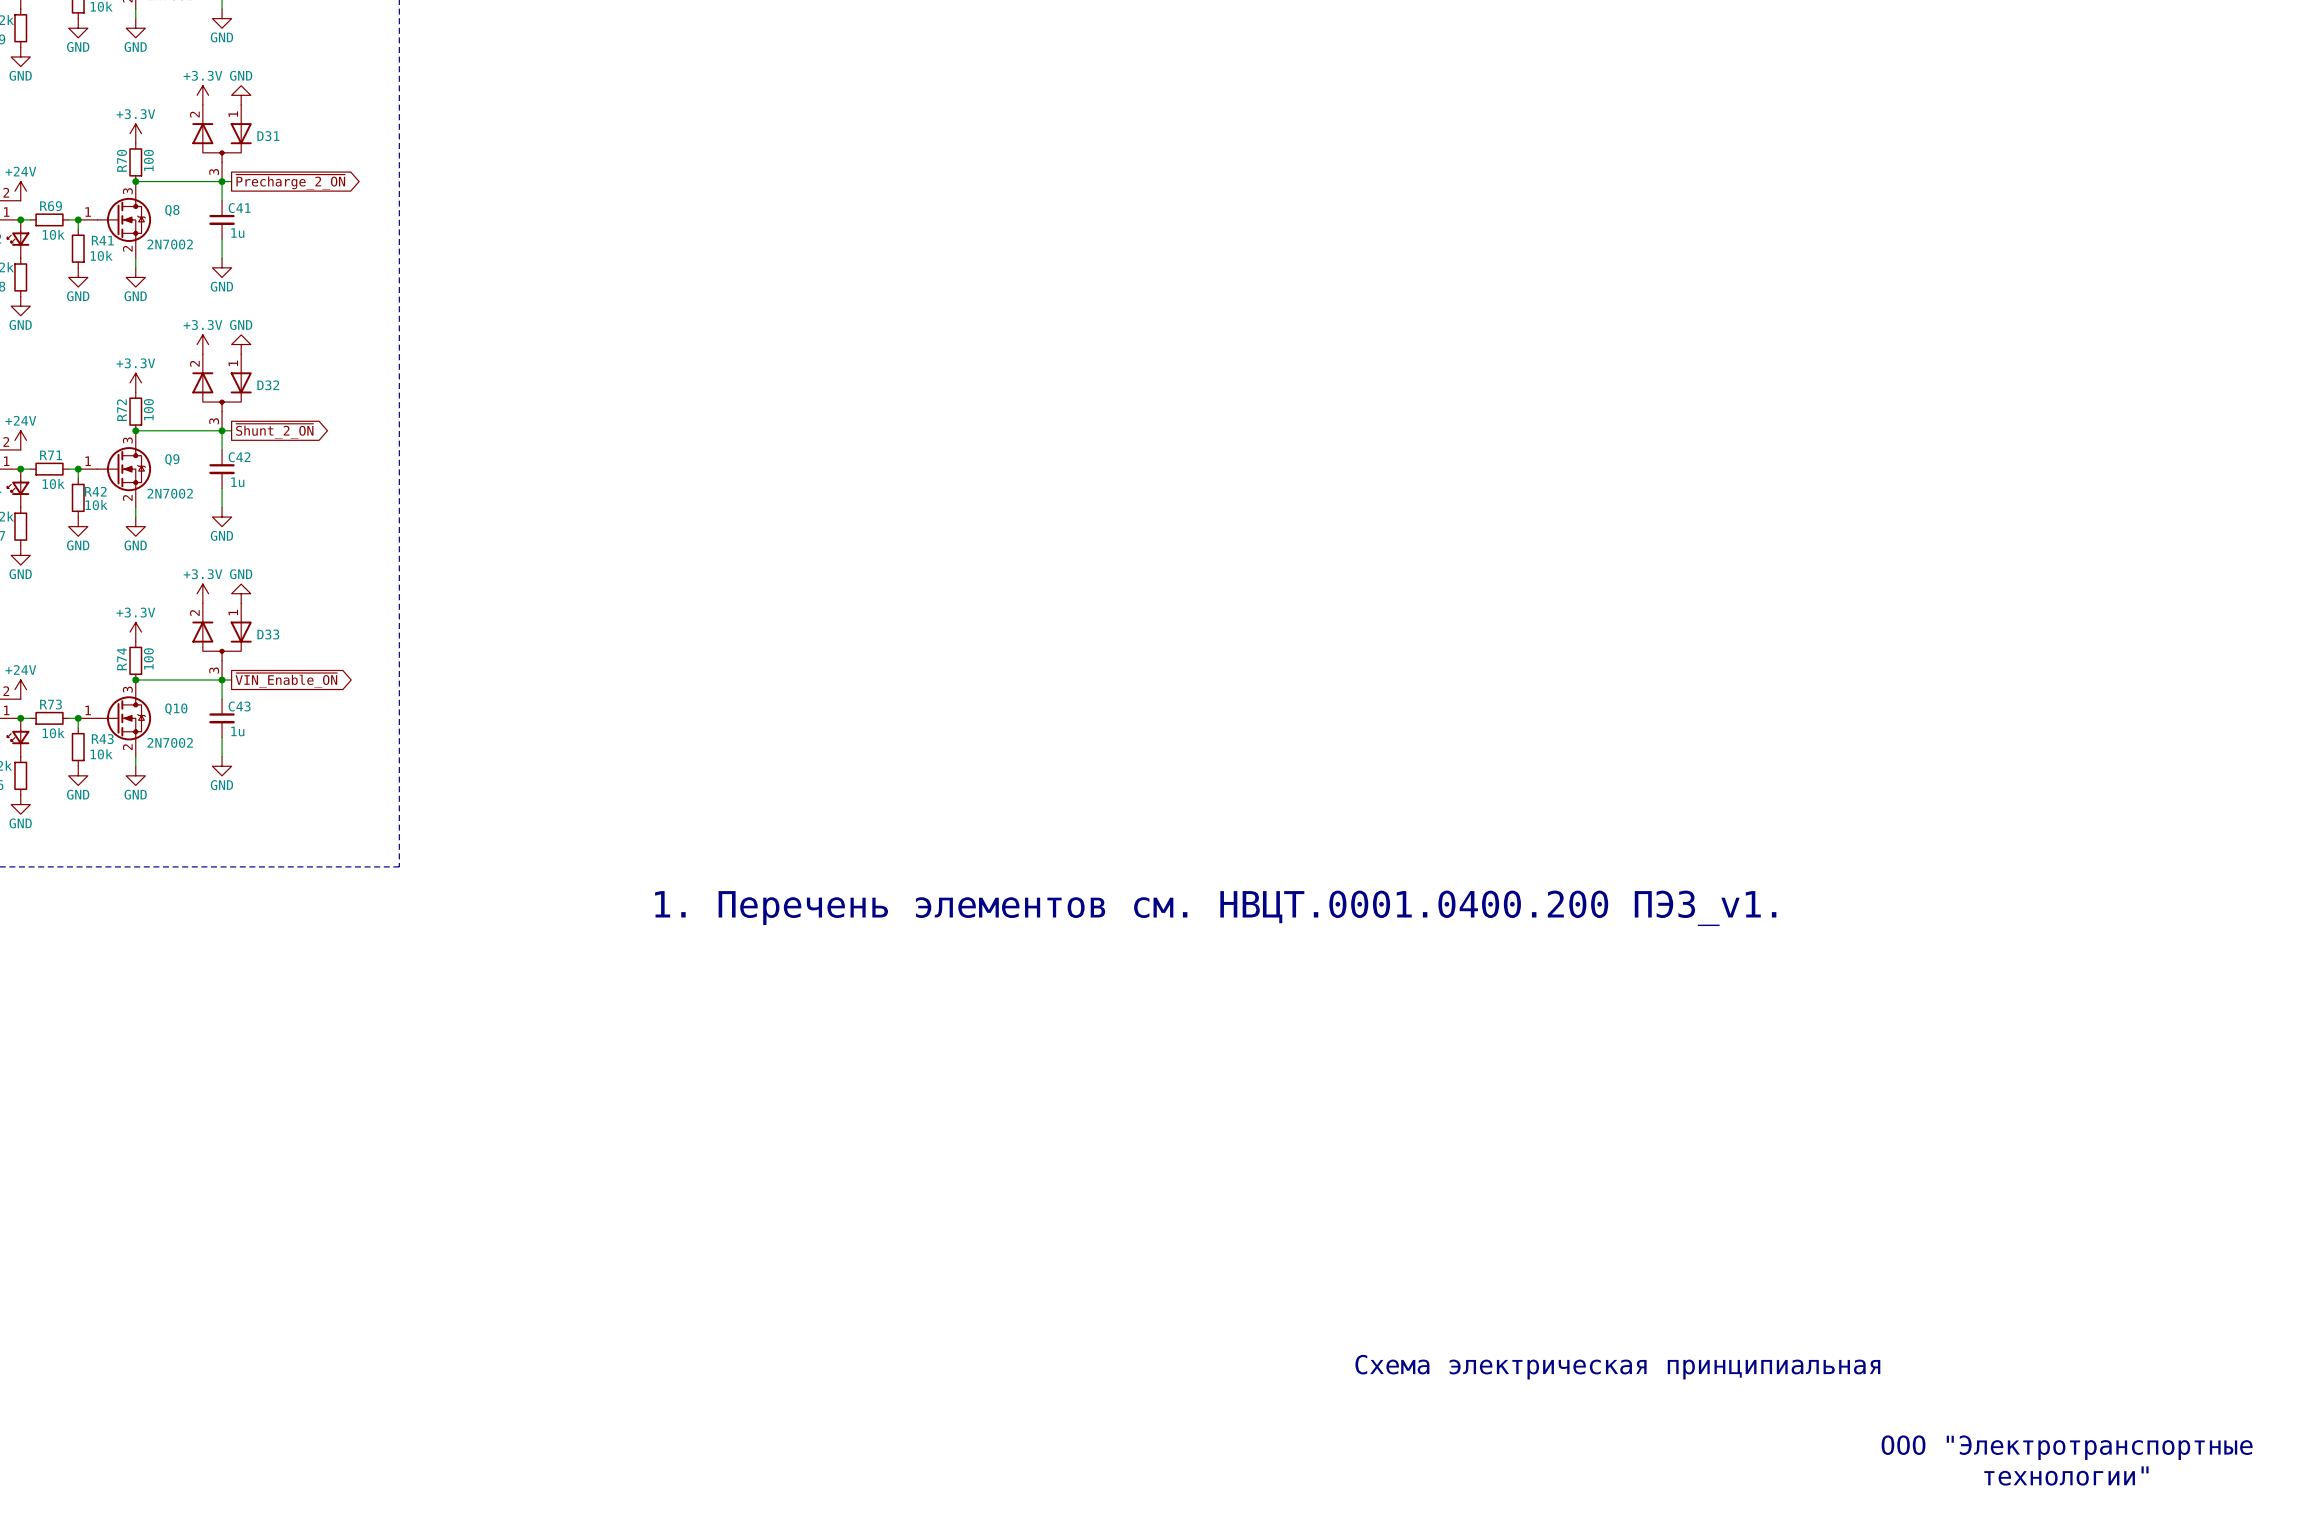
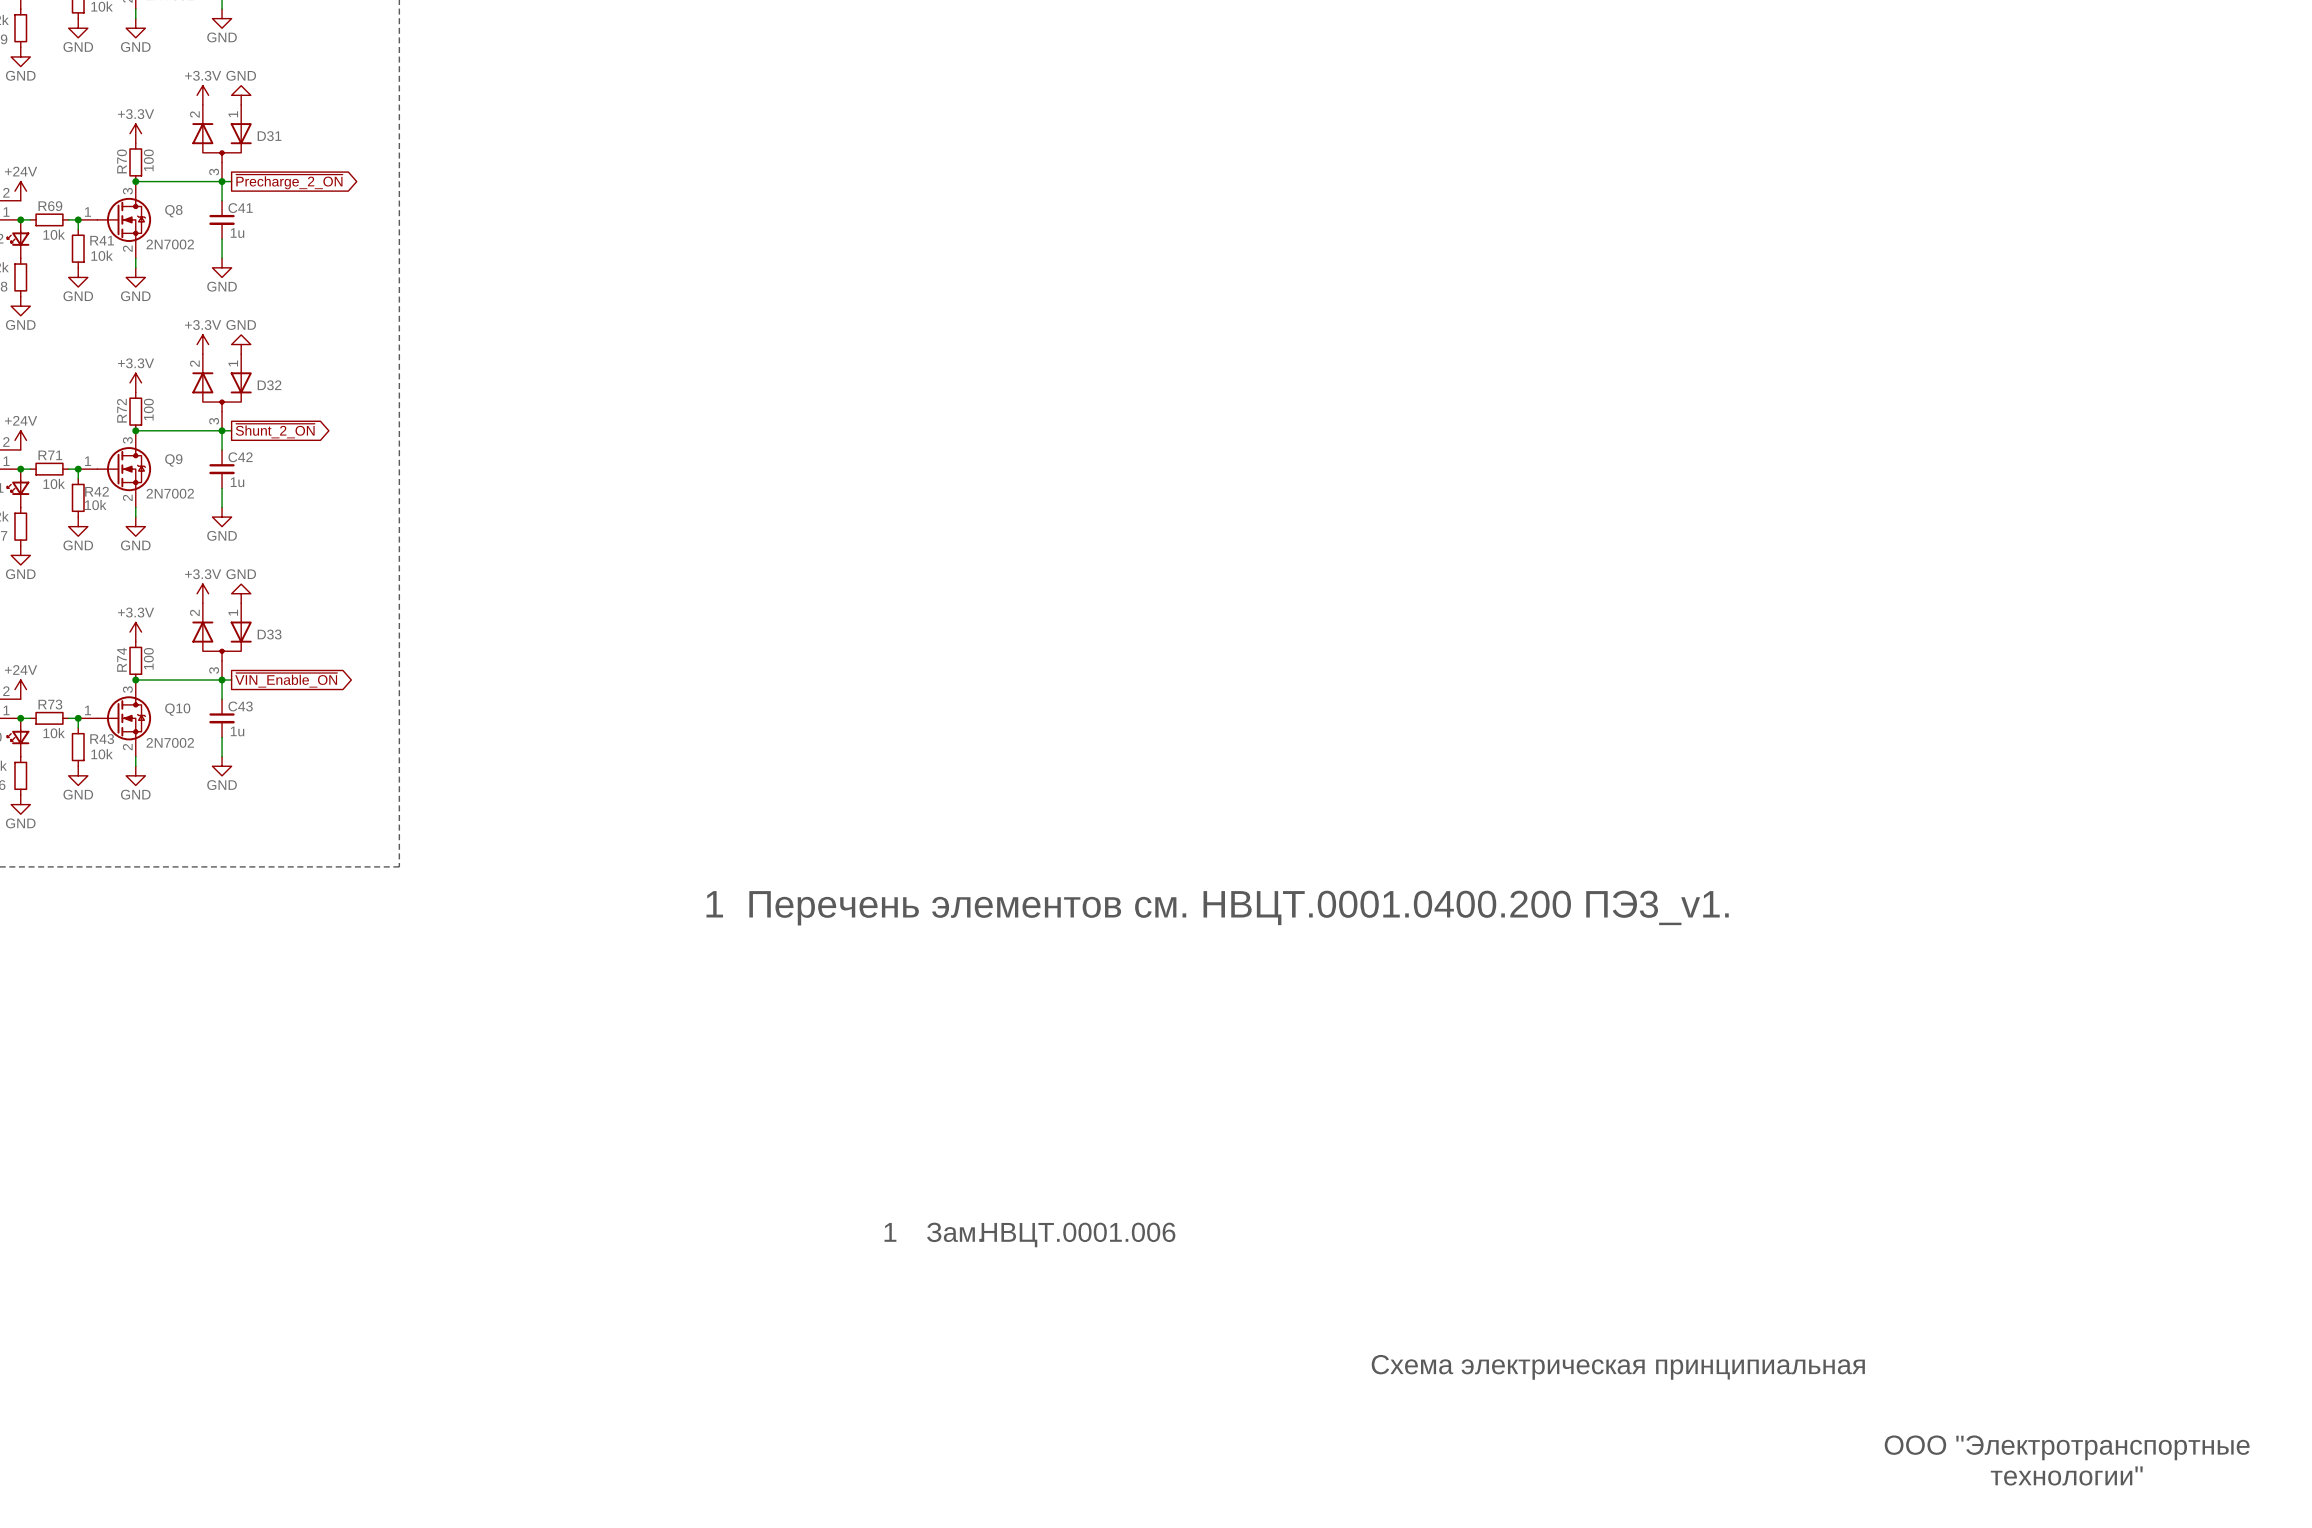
text: 1. Перечень элементов см. НВЦТ.0001.0400.200 ПЭ3_v1. (1215, 908) -> 1 Перечень элементов см. НВЦТ.0001.0400.200 ПЭ3_v1. (1217, 908)
text: none -> 1 (890, 1232)
text: none -> Зам. (954, 1232)
text: none -> НВЦТ.0001.006 (1078, 1234)

